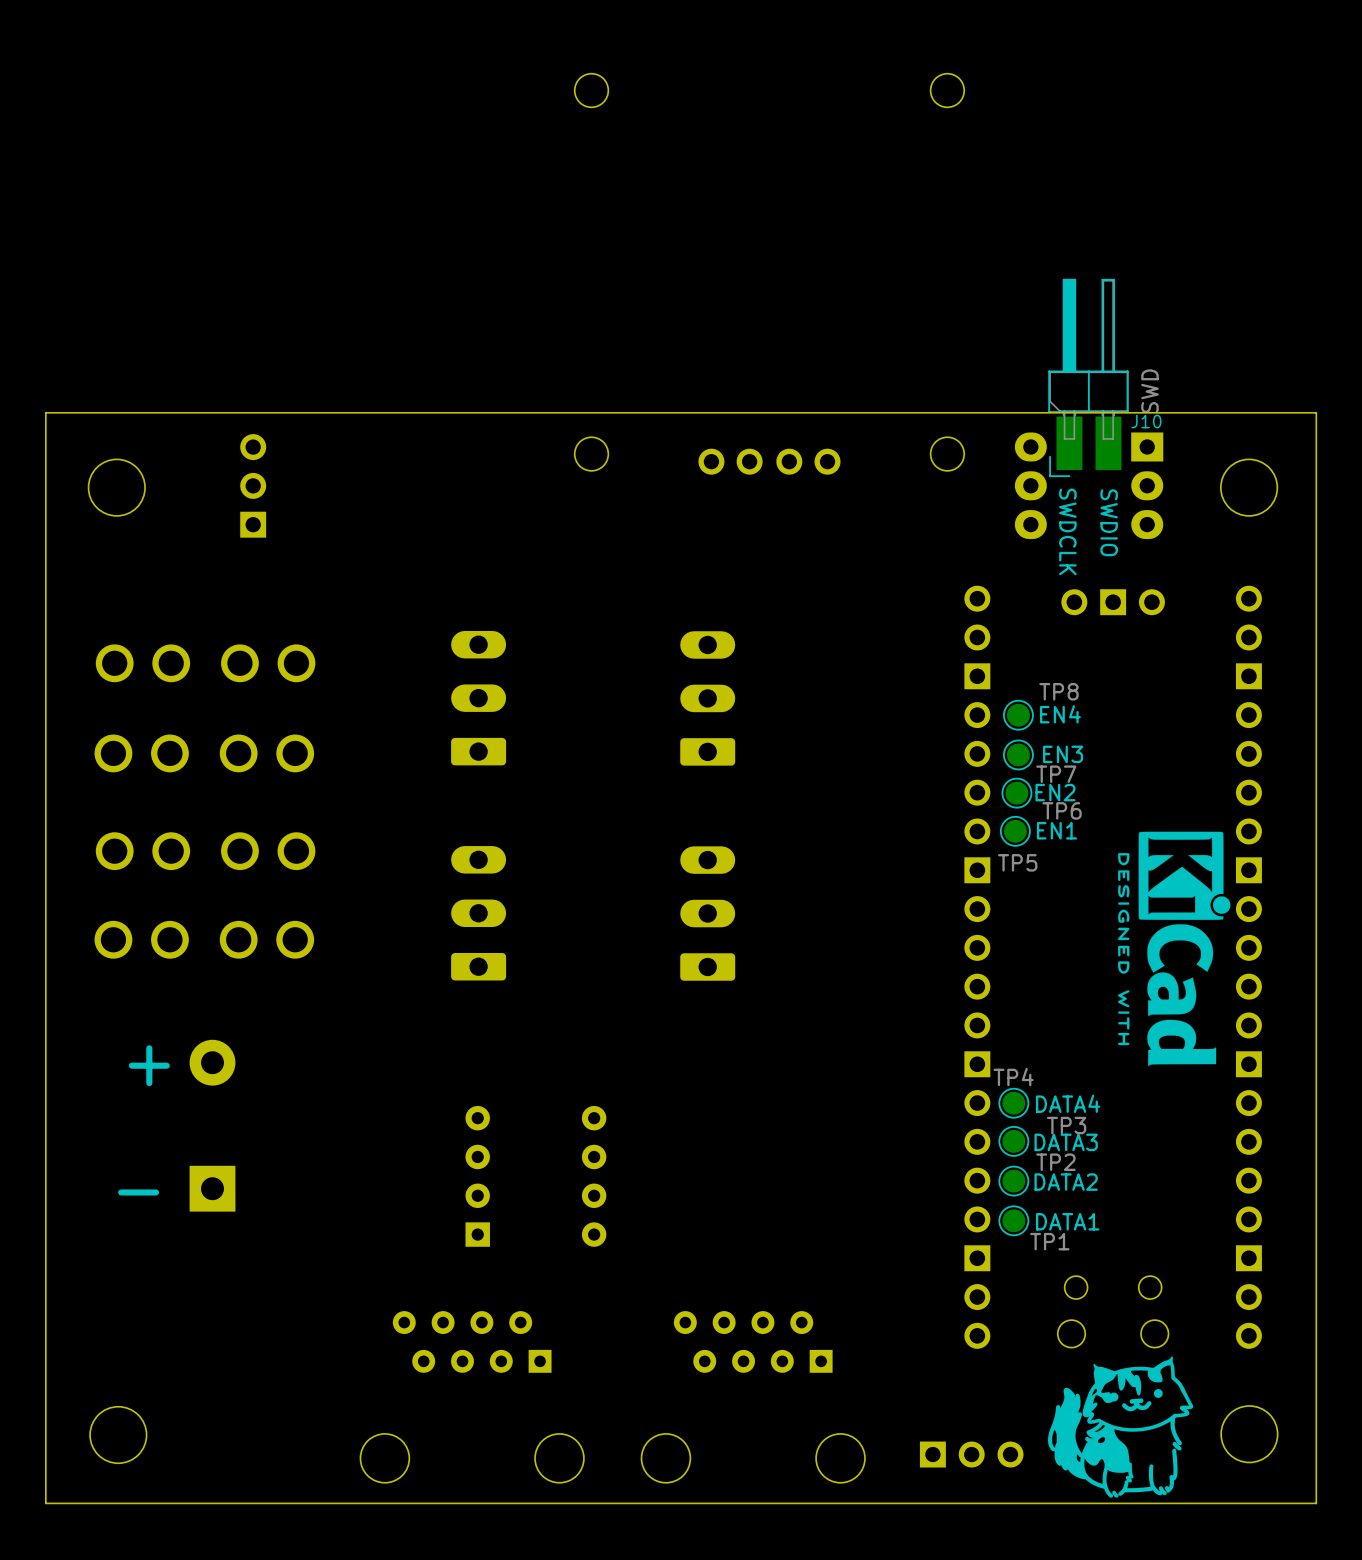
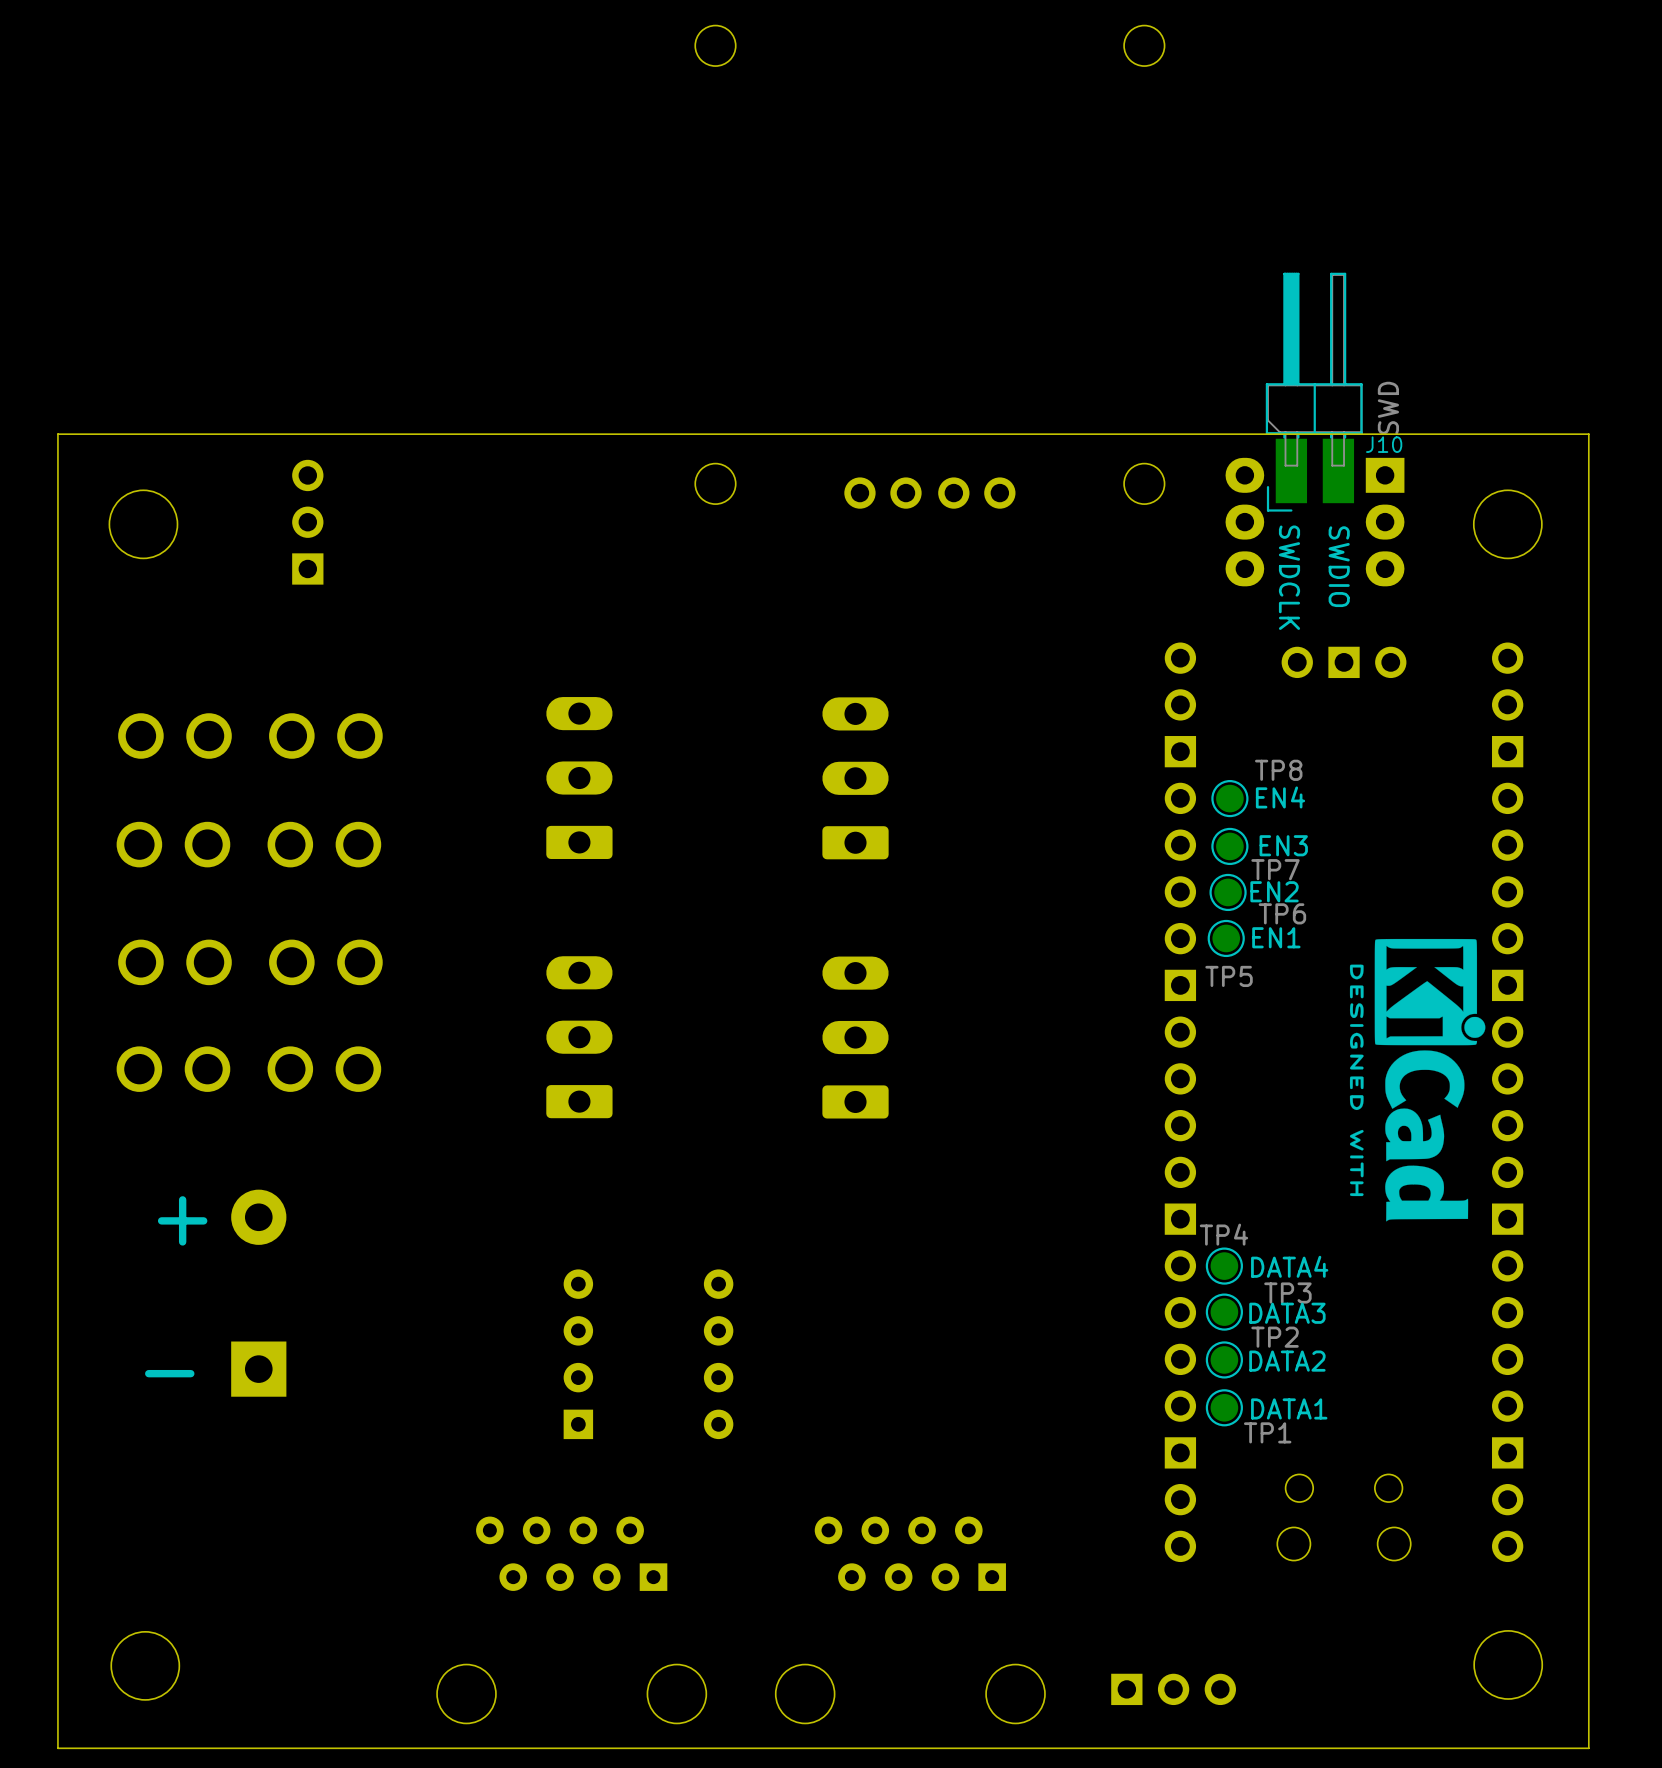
drawing: [1048, 1356, 1194, 1498] -> none

